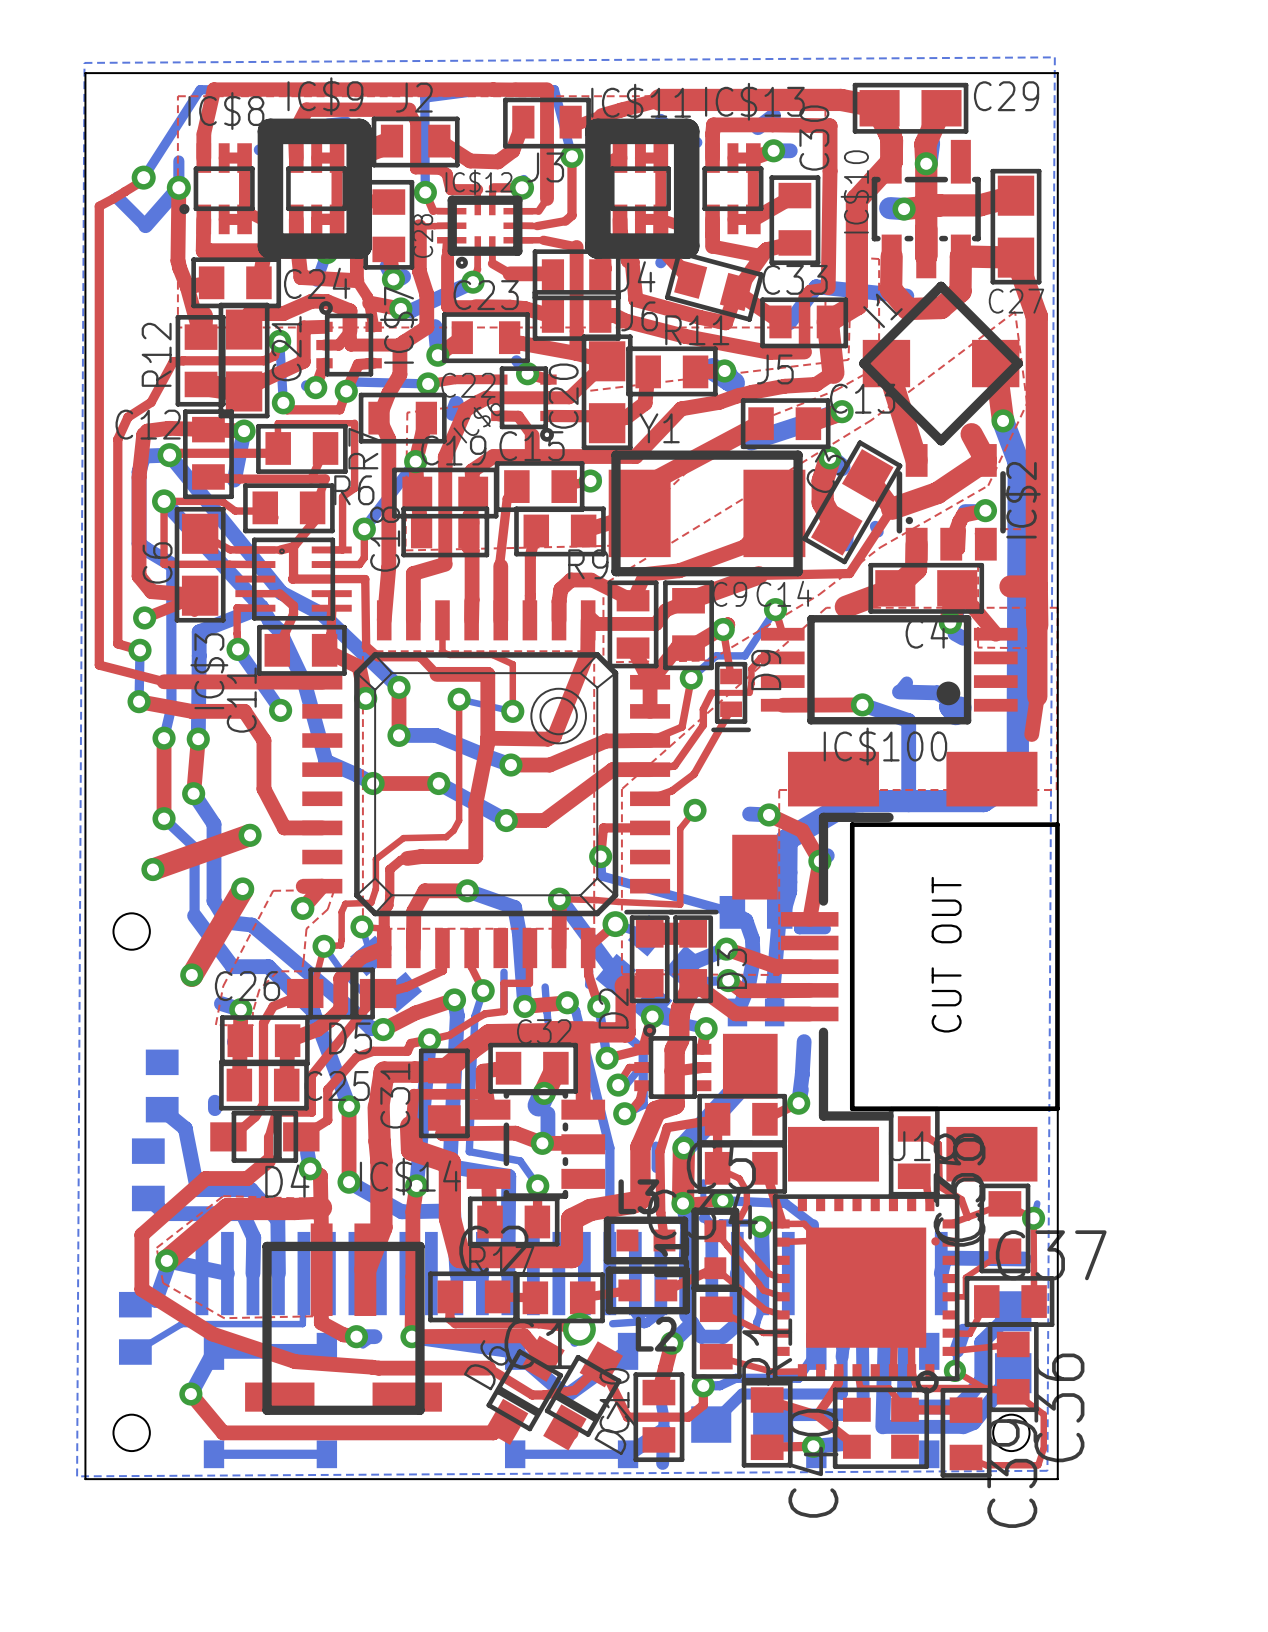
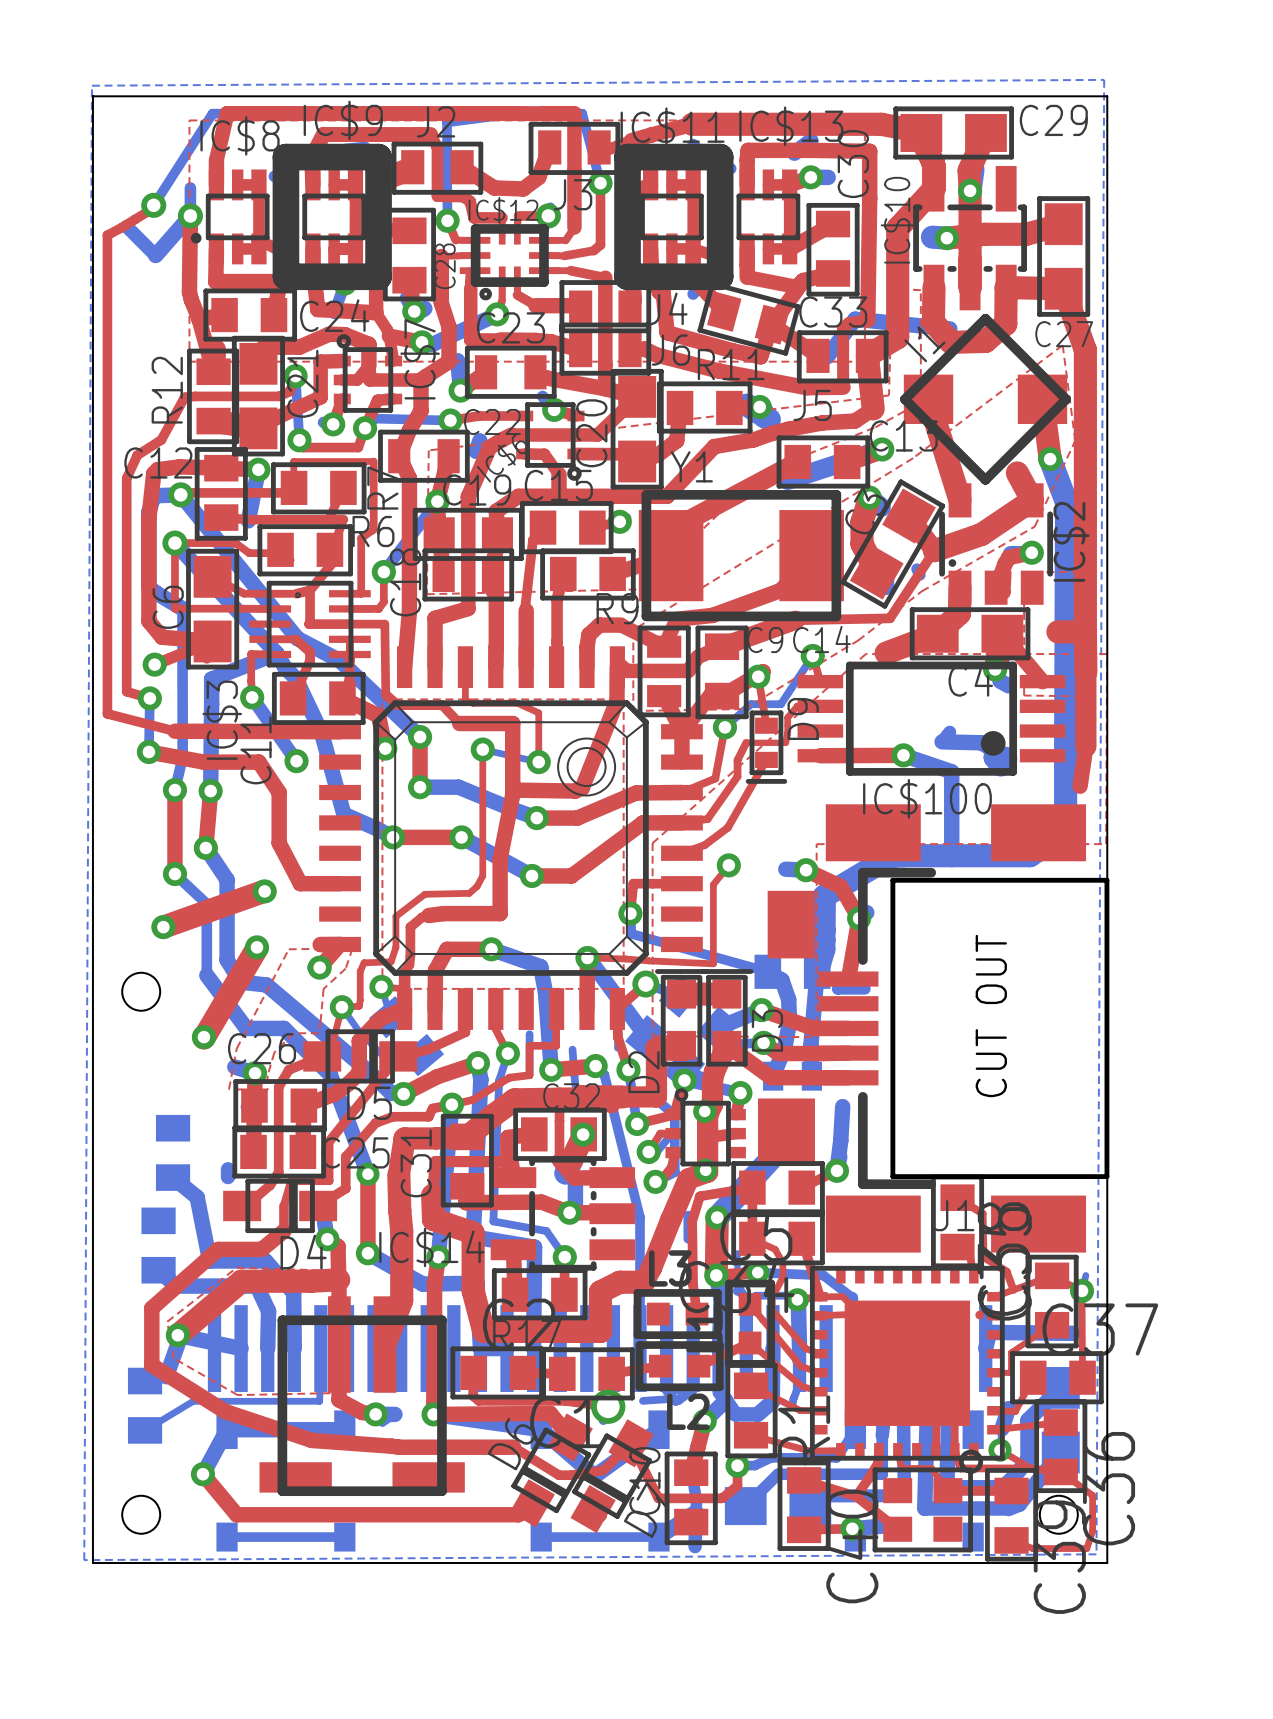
top track: (583, 1040) (583, 1109) -> (559, 1099) (559, 1160) (574, 1178) (612, 1177)
via: none -> (704, 1111)
via position: (544, 1093) -> (583, 1134)
via: none -> (705, 1170)
top track: (656, 1110) (640, 1147) (640, 1199) (590, 1209) -> (688, 1178) (643, 1282) (619, 1282)

